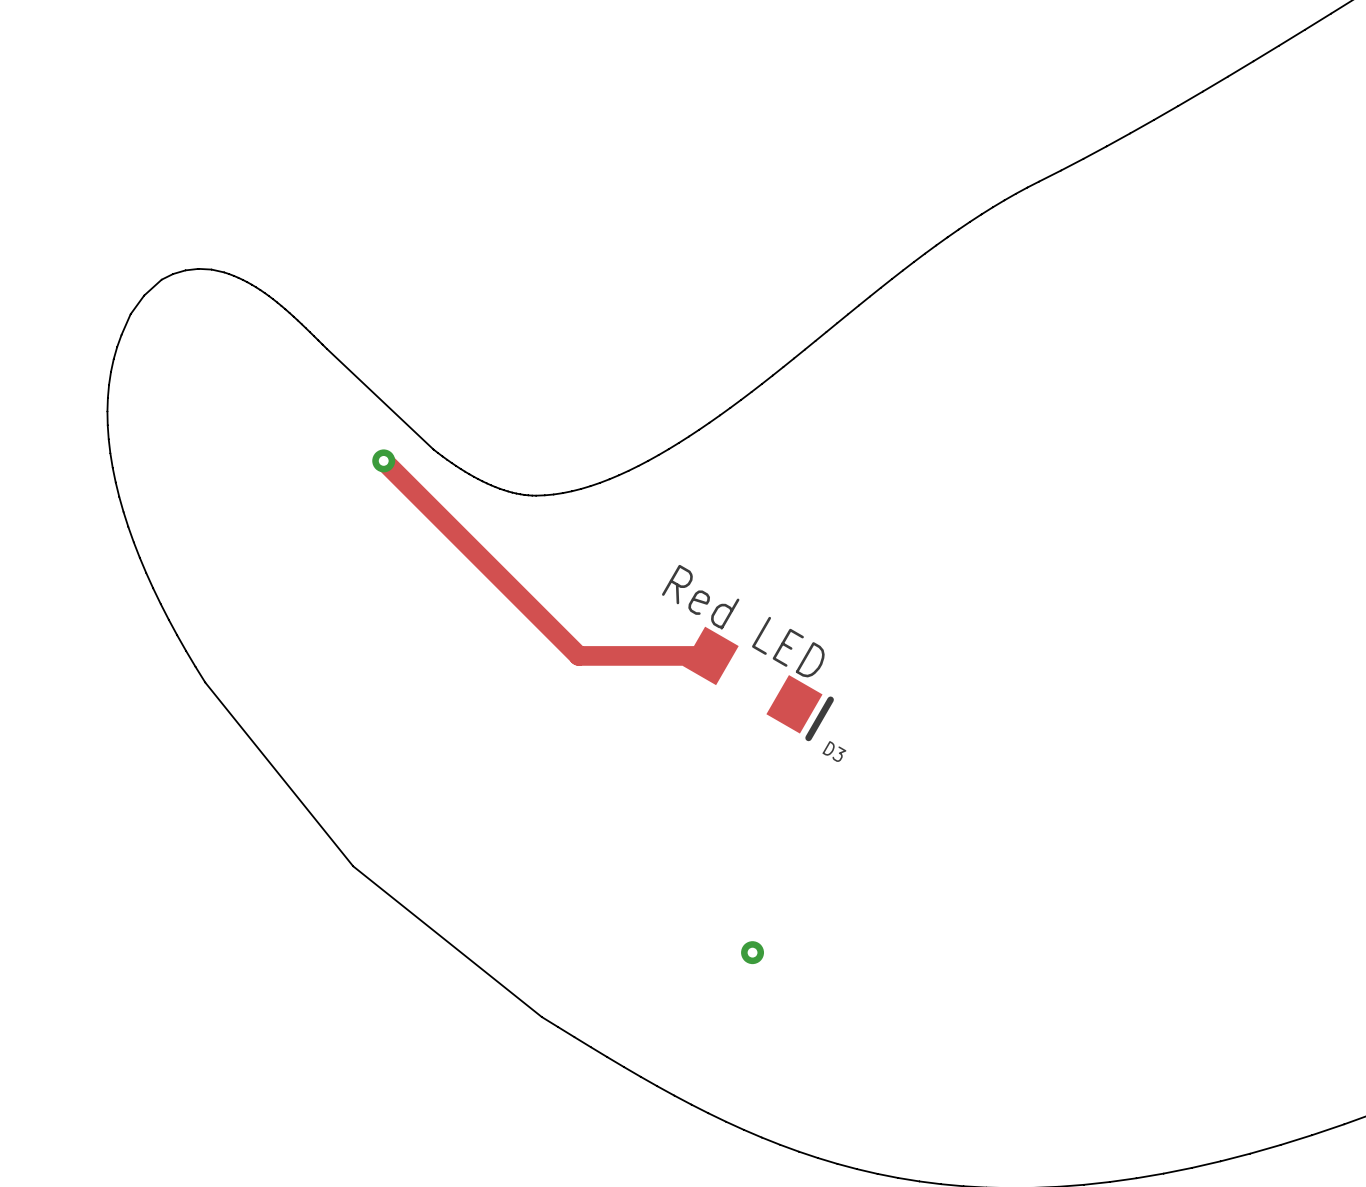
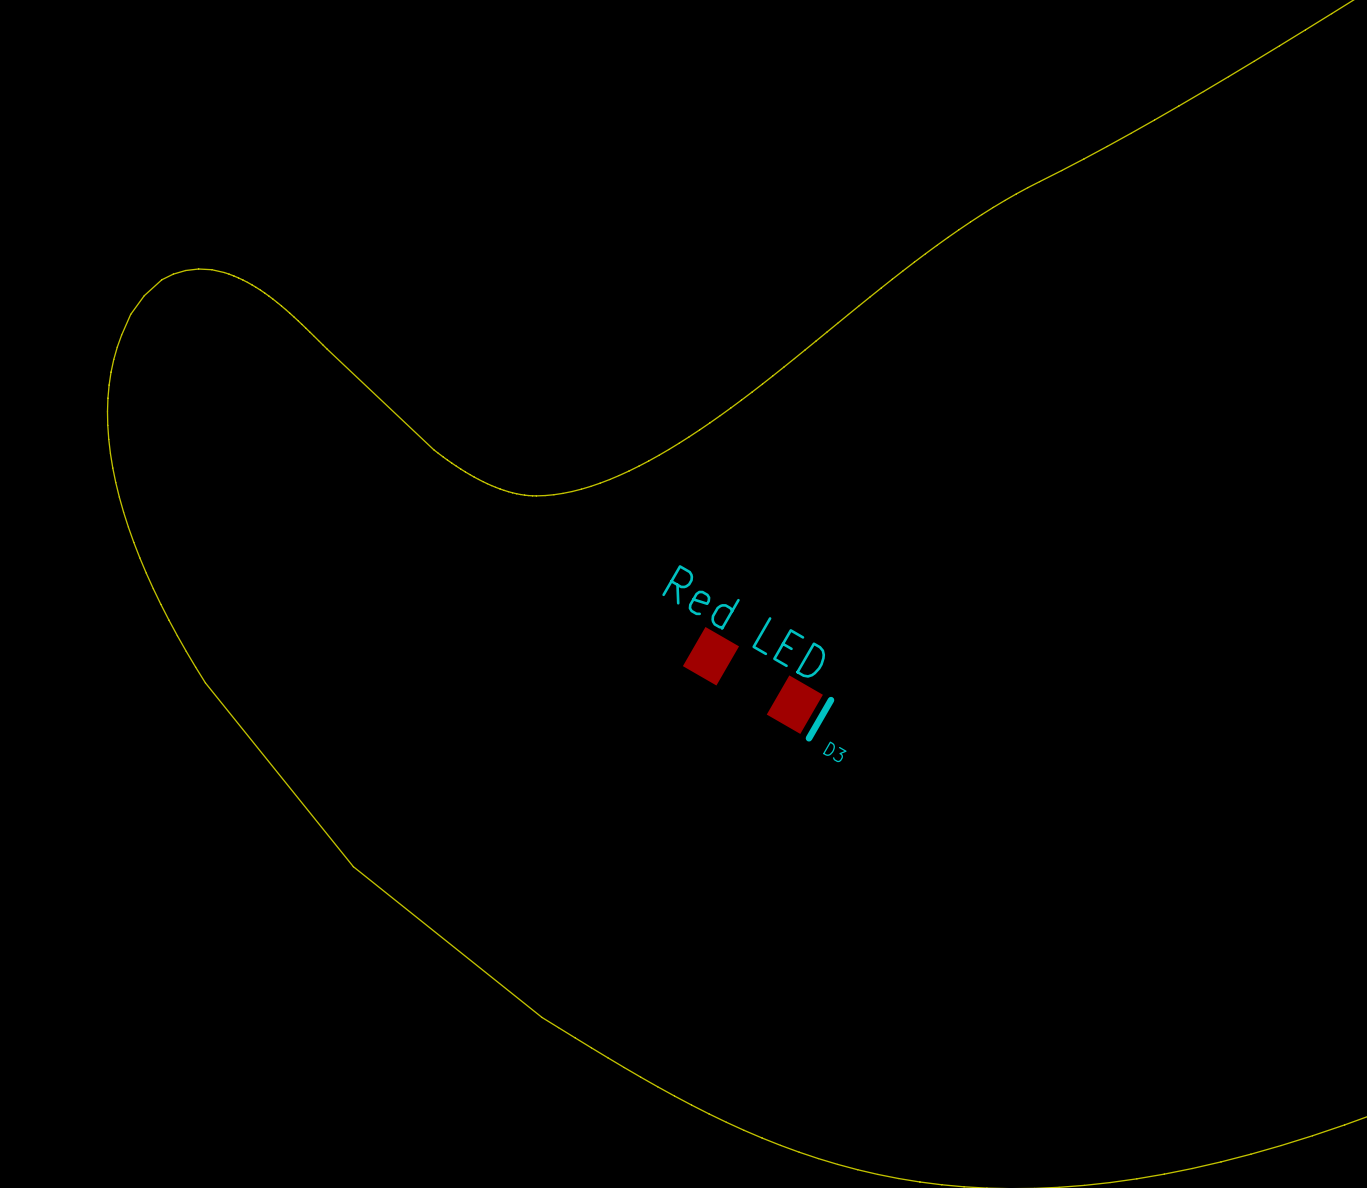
track: (383, 460) (578, 655) (710, 655) -> none
via: (383, 460) -> none
via: (752, 952) -> none

